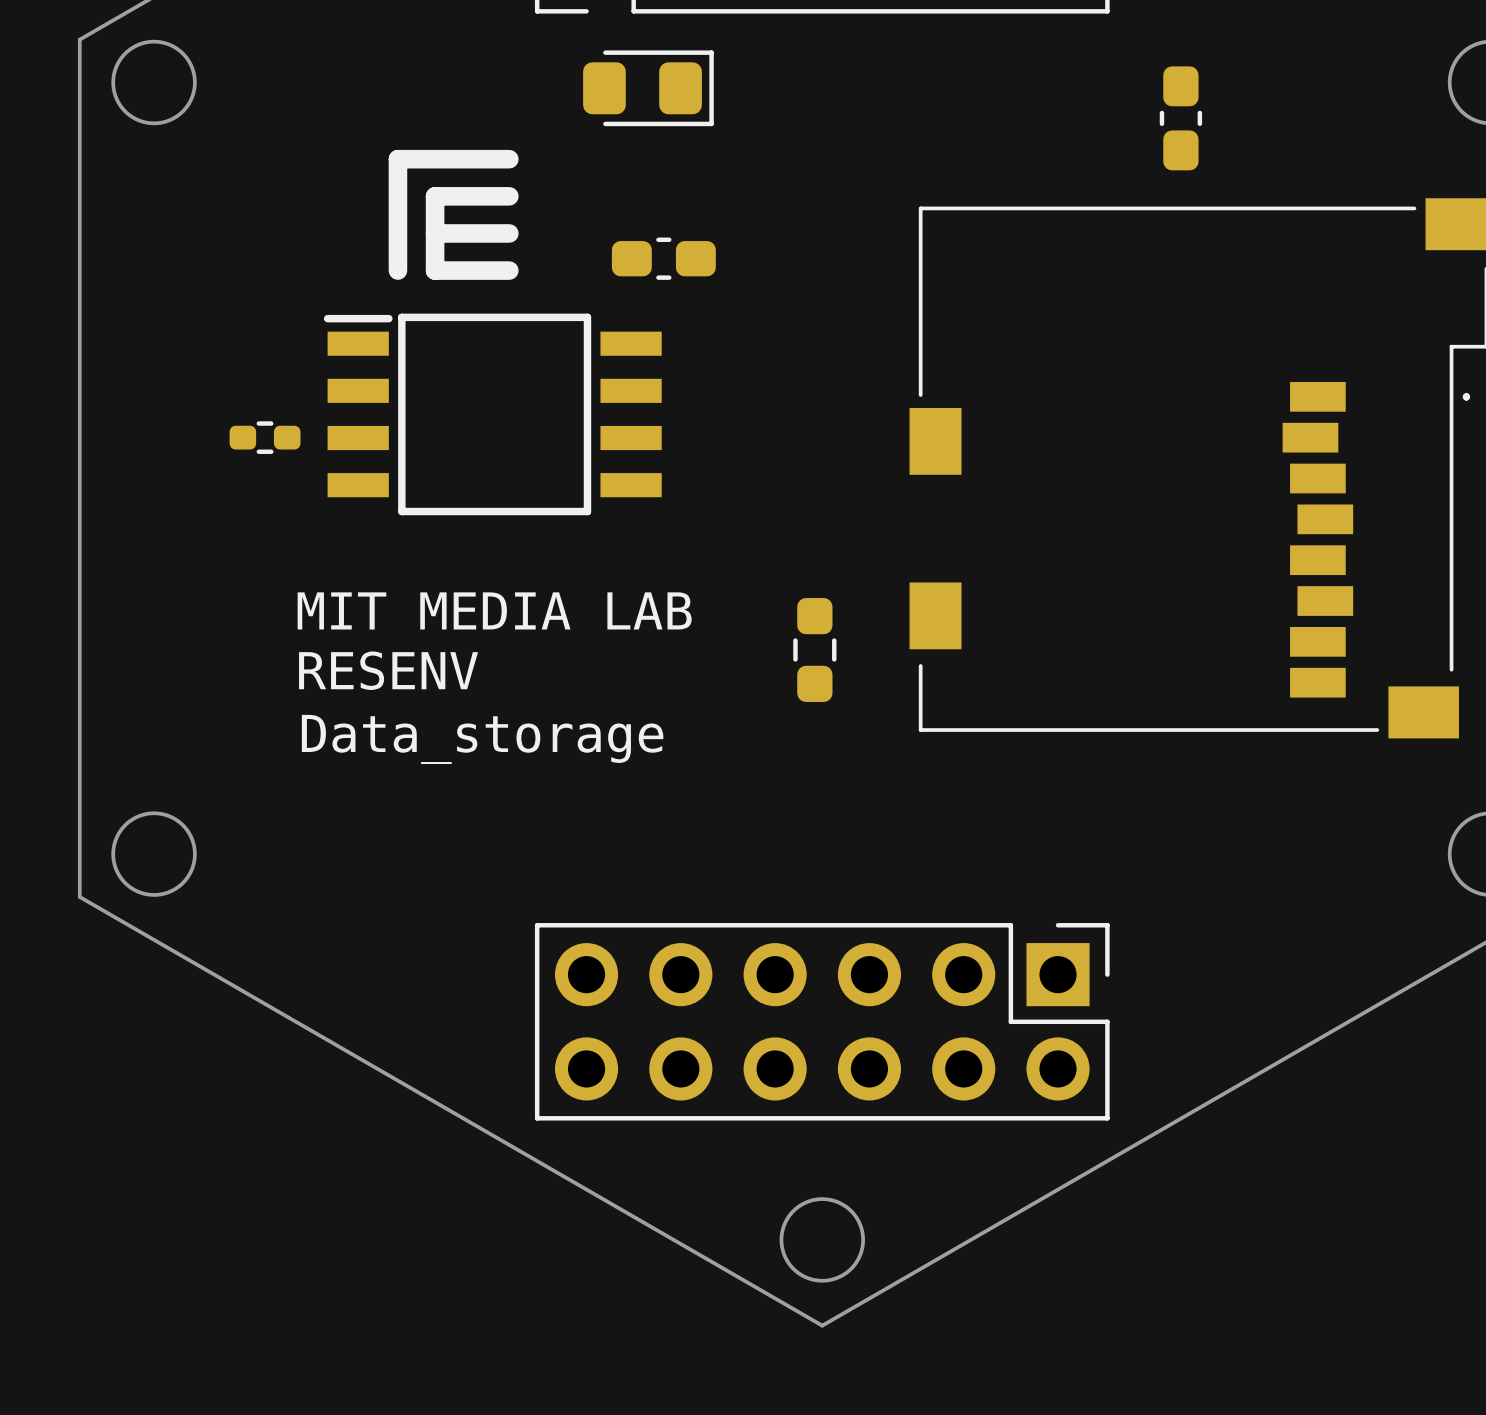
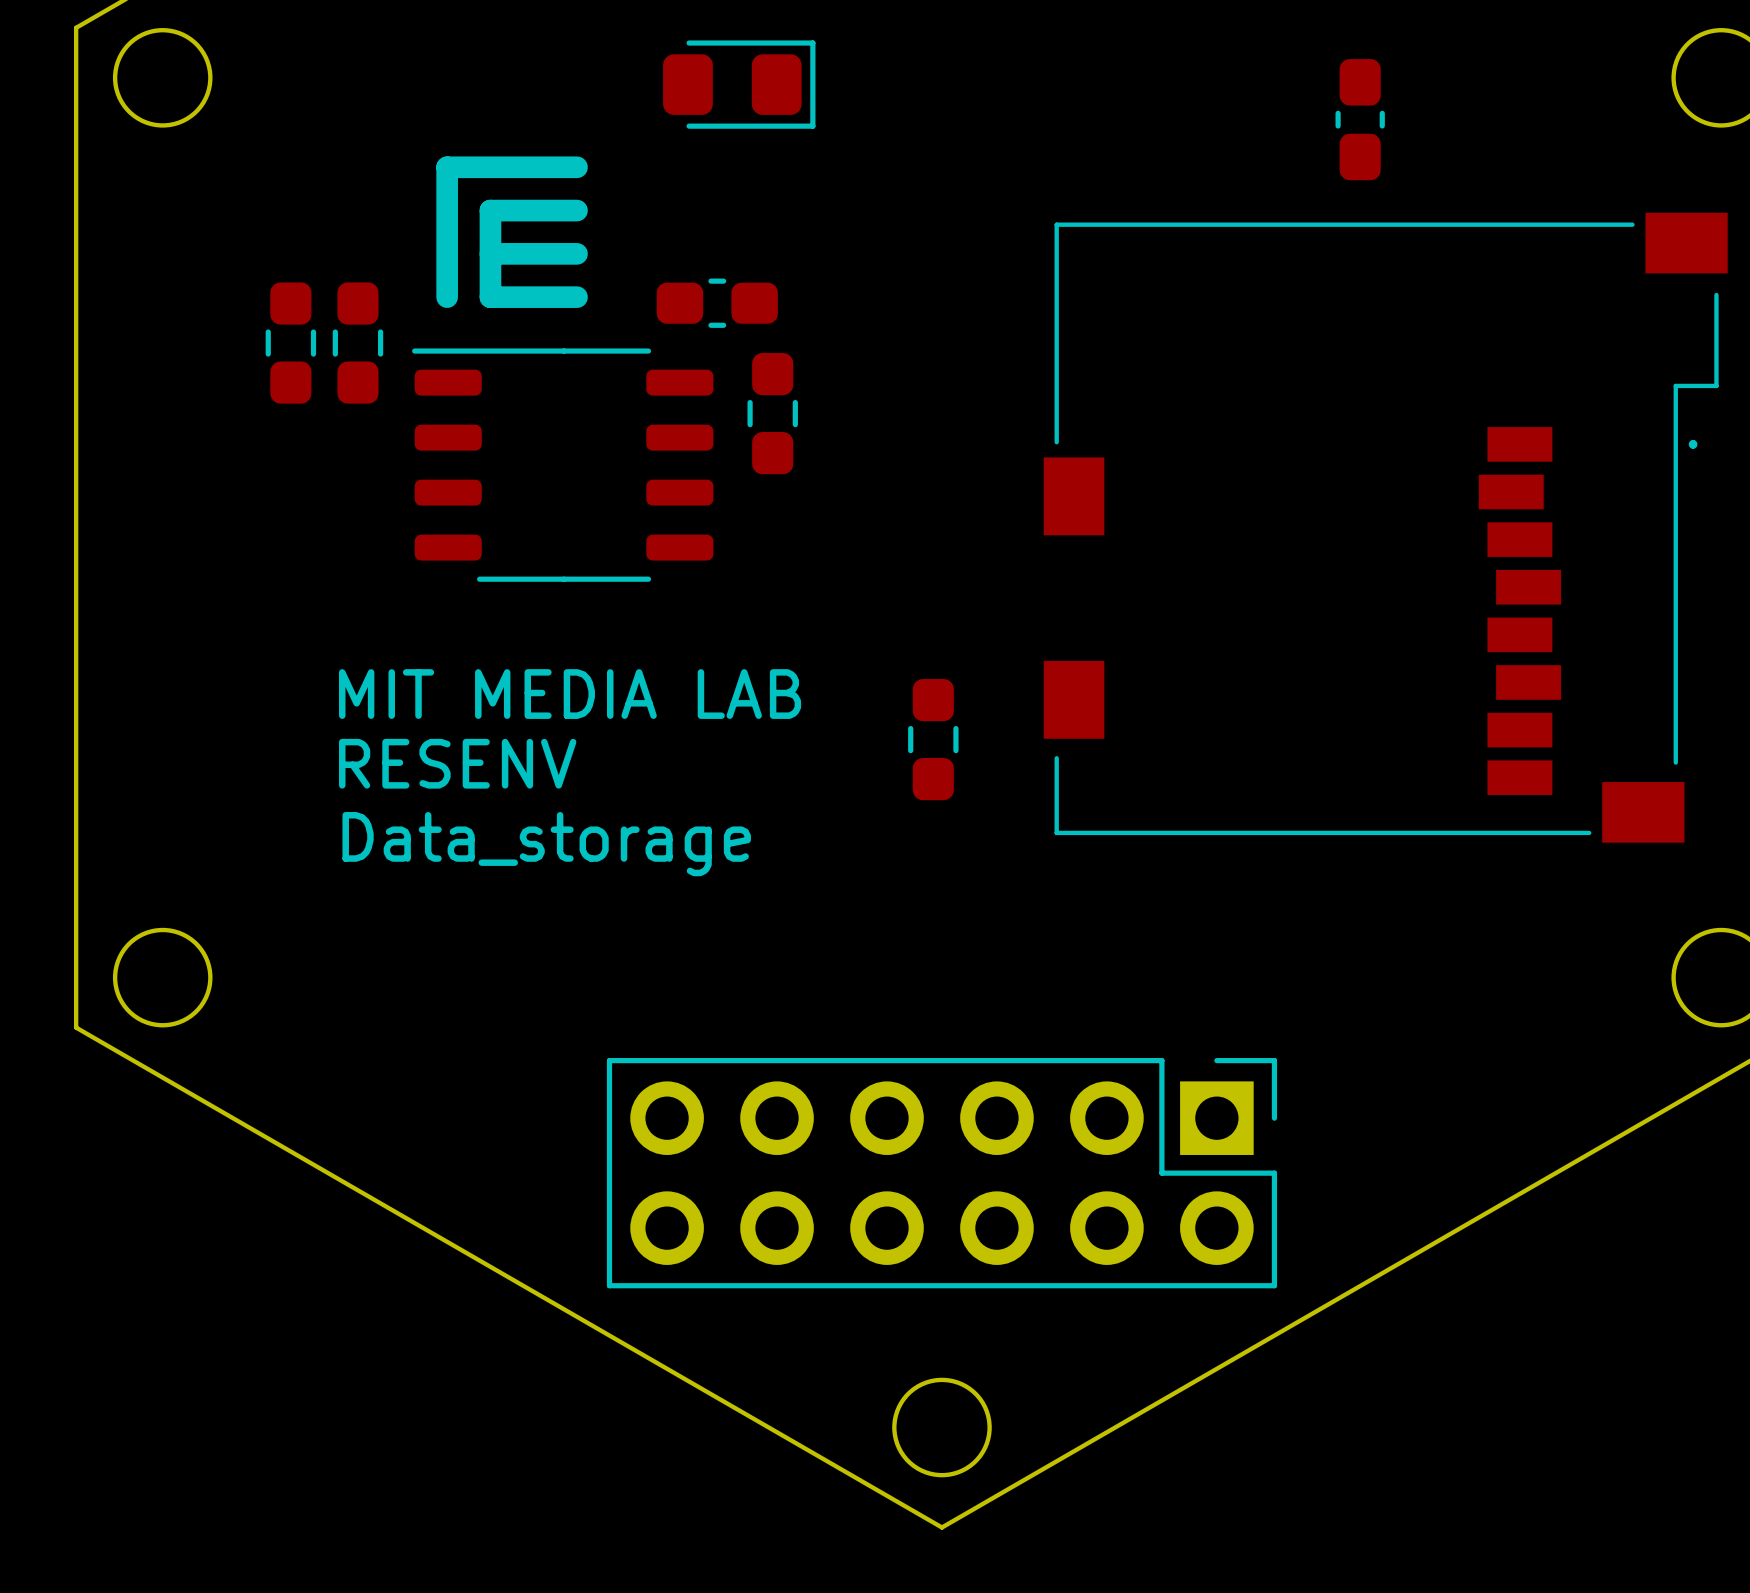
part position: (663, 258) -> (717, 303)
part: none -> (290, 343)
part: none -> (357, 343)
part footprint: [323, 313, 662, 516] -> [412, 348, 714, 582]
part: none -> (772, 413)
part: (265, 437) -> none

